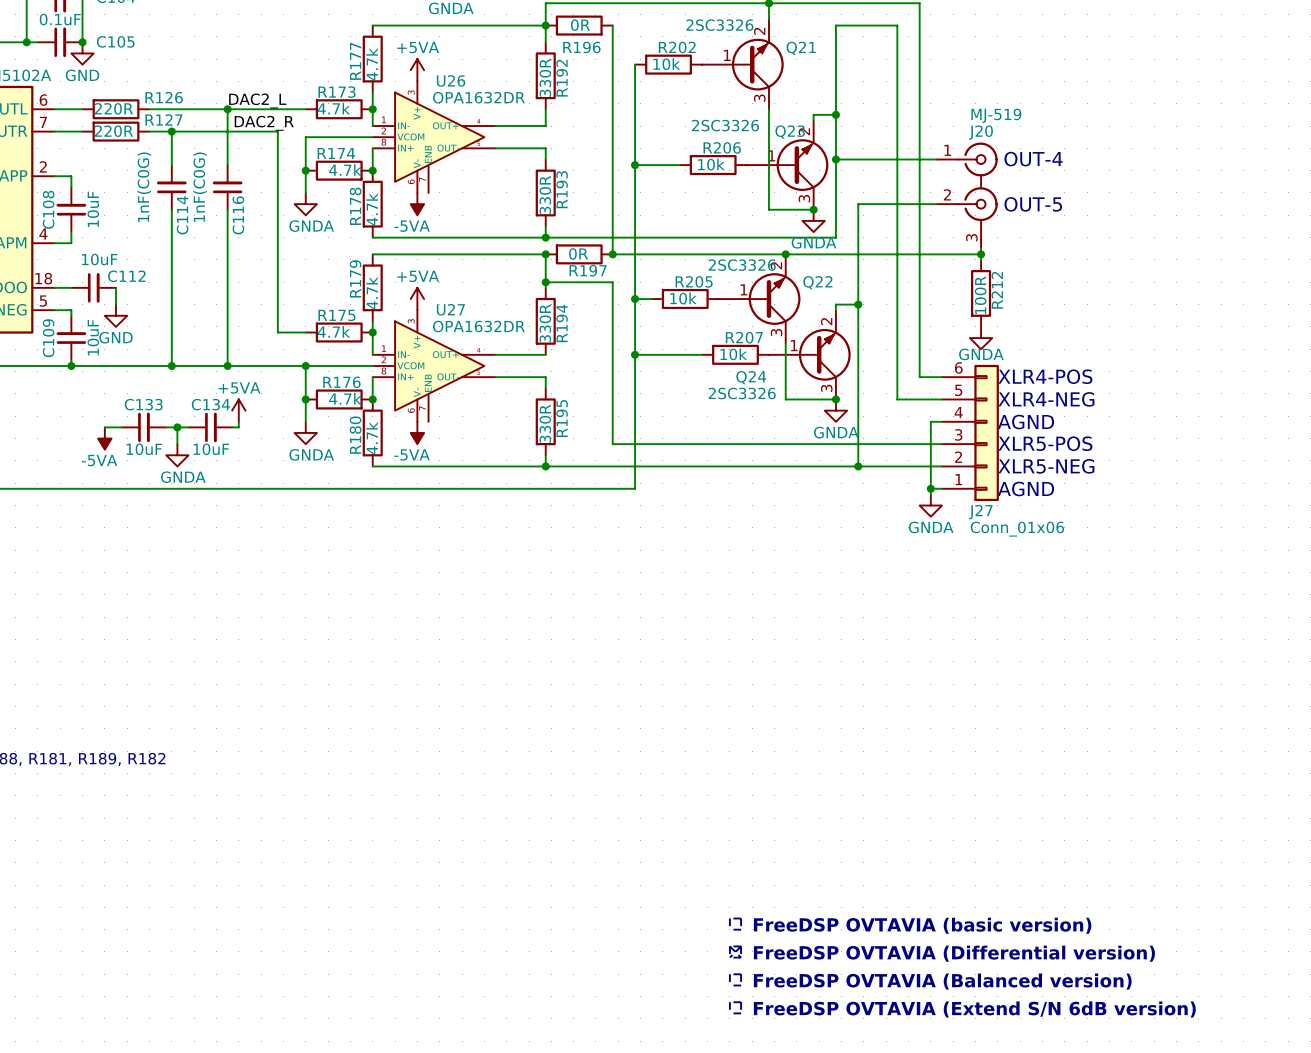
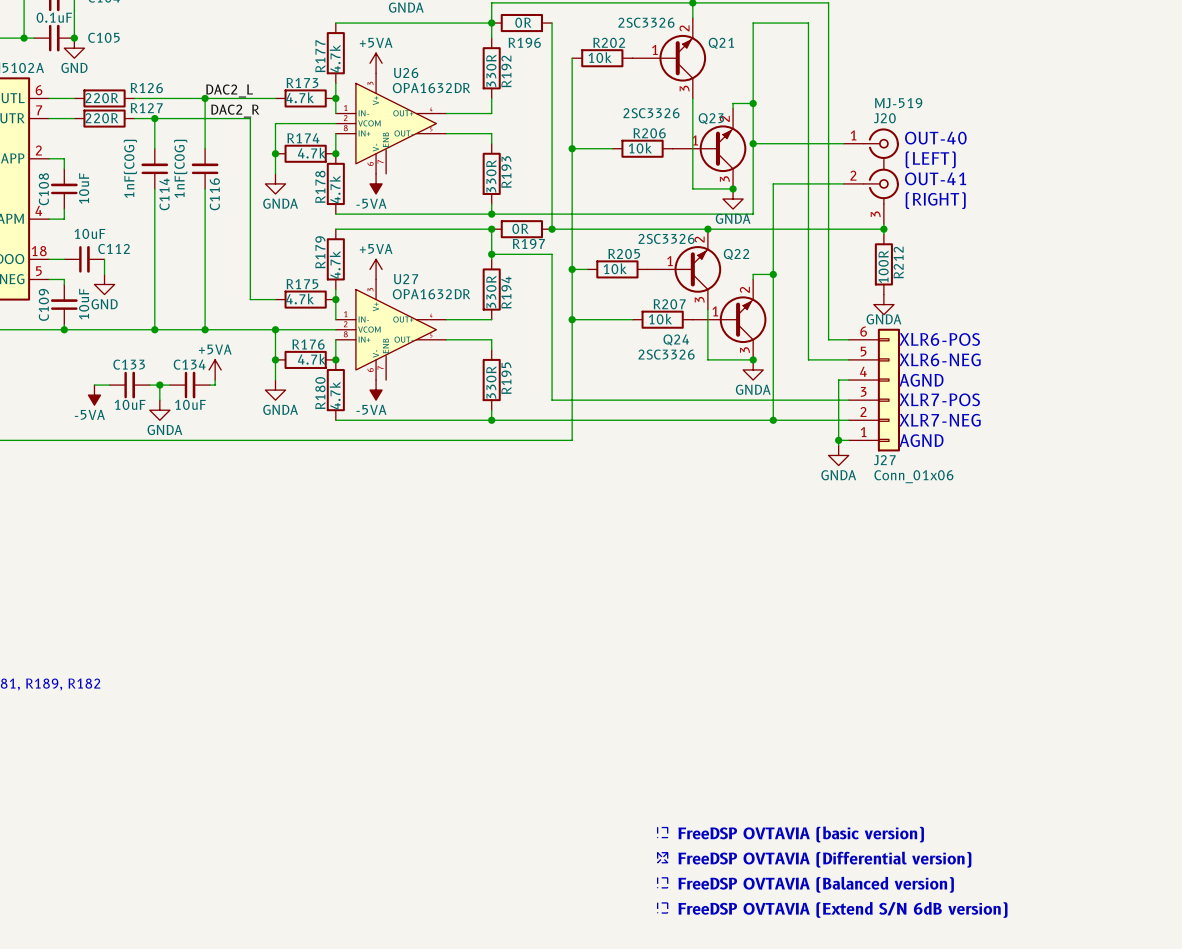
text: OUT-4 (1033, 159) -> OUT-40 (935, 138)
text: none -> (LEFT) (930, 159)
text: OUT-5 (1033, 204) -> OUT-41 (935, 178)
text: none -> (RIGHT) (935, 200)
text: XLR4-POS (1045, 376) -> XLR6-POS (939, 339)
text: XLR4-NEG (1046, 399) -> XLR6-NEG (940, 359)
text: XLR5-POS (1045, 443) -> XLR7-POS (939, 399)
text: XLR5-NEG (1046, 466) -> XLR7-NEG (940, 420)

